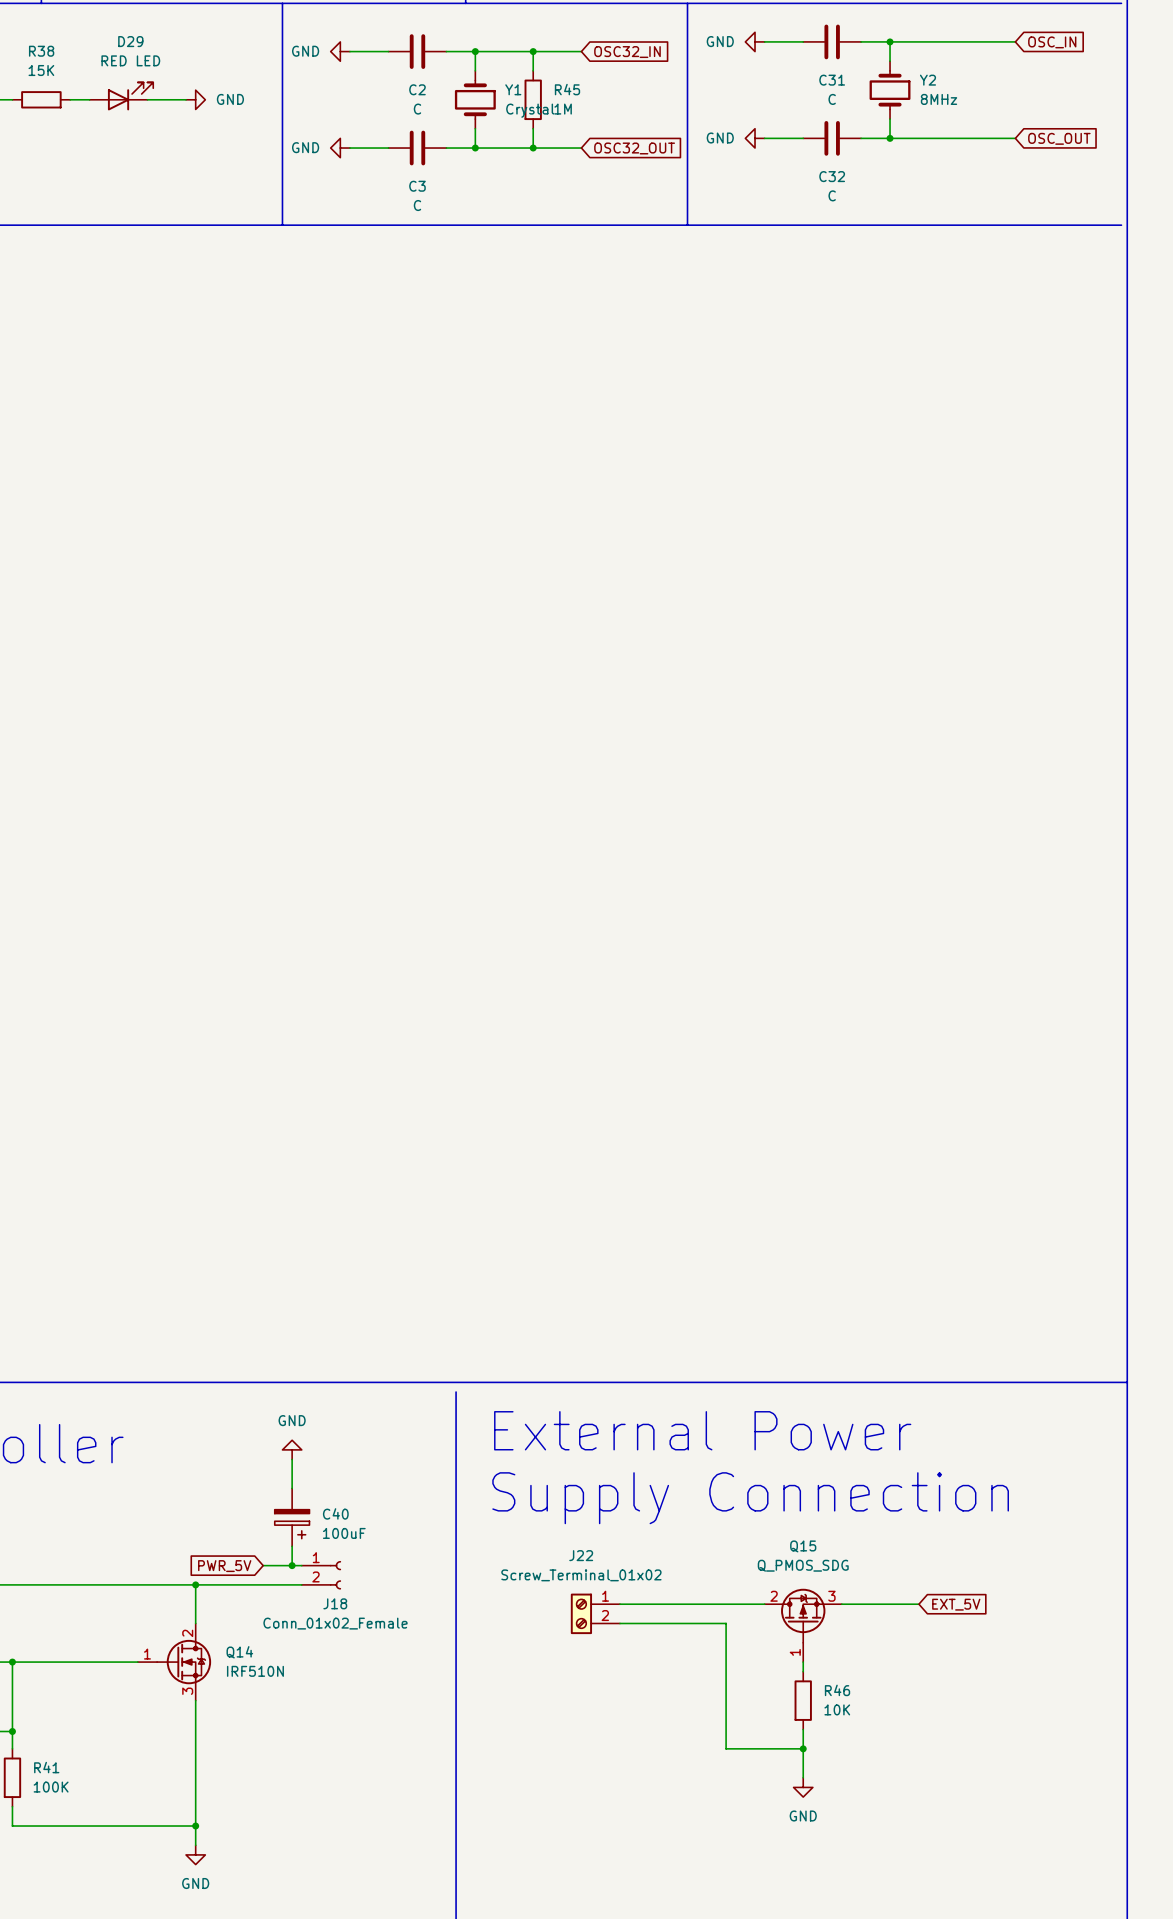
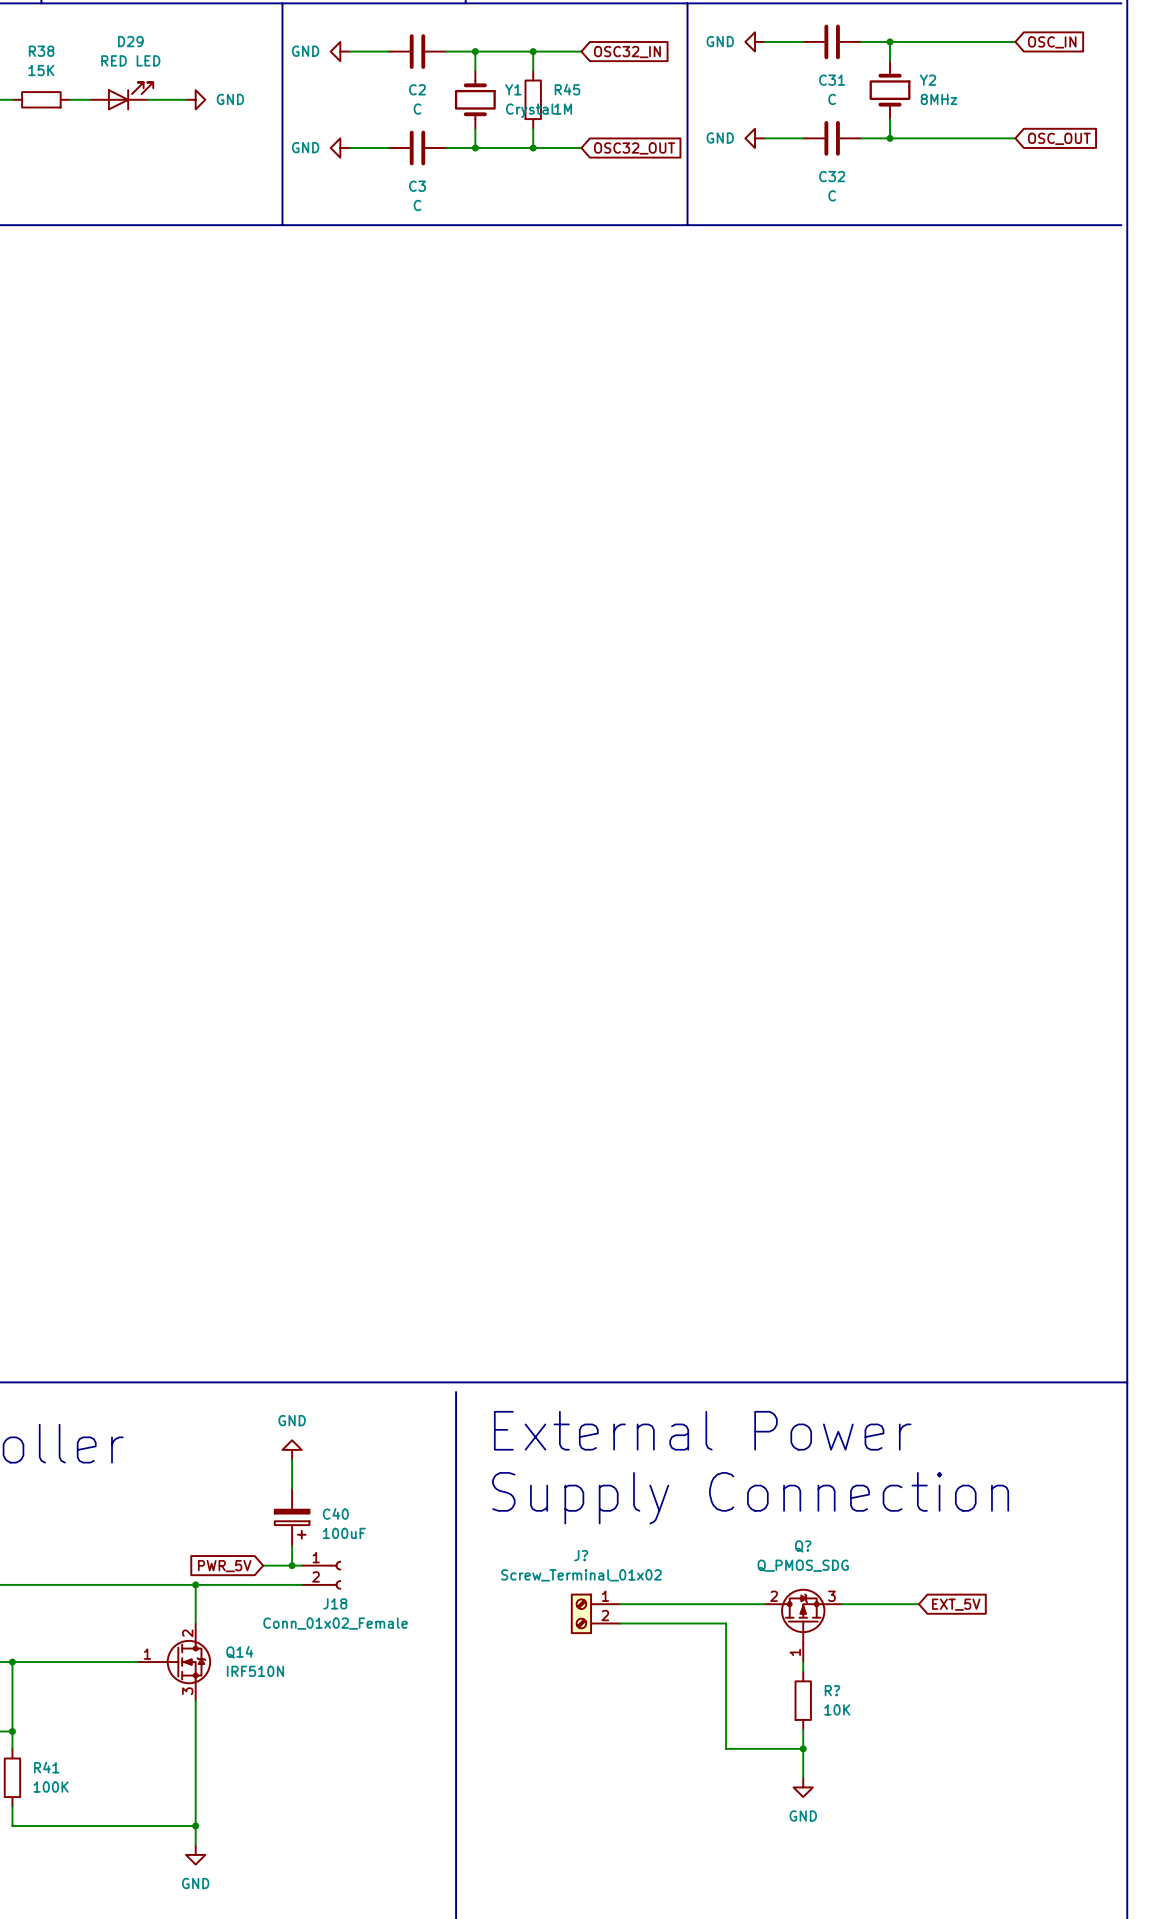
Q15 name: Q15 (803, 1546) -> Q? (803, 1546)
J22 name: J22 (581, 1555) -> J? (581, 1555)
R46 name: R46 (837, 1690) -> R? (832, 1690)

